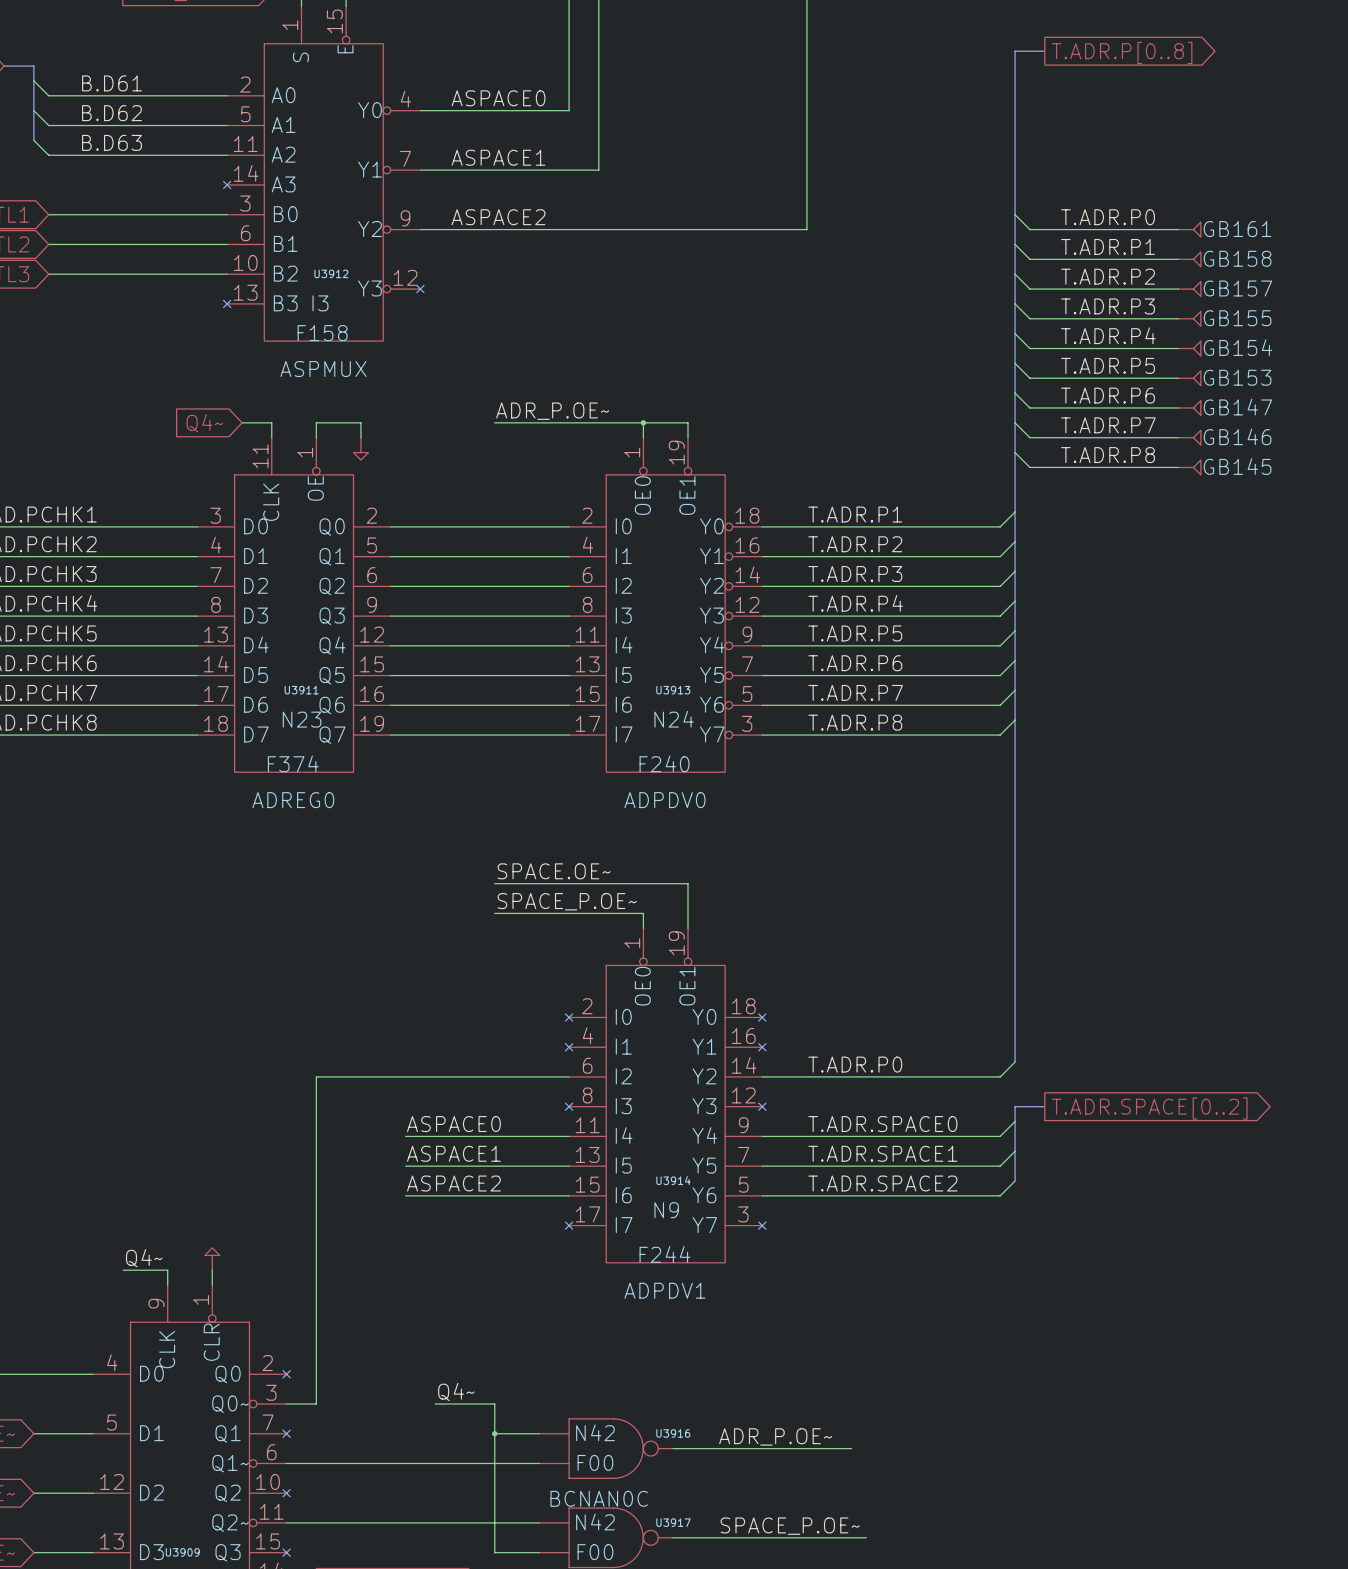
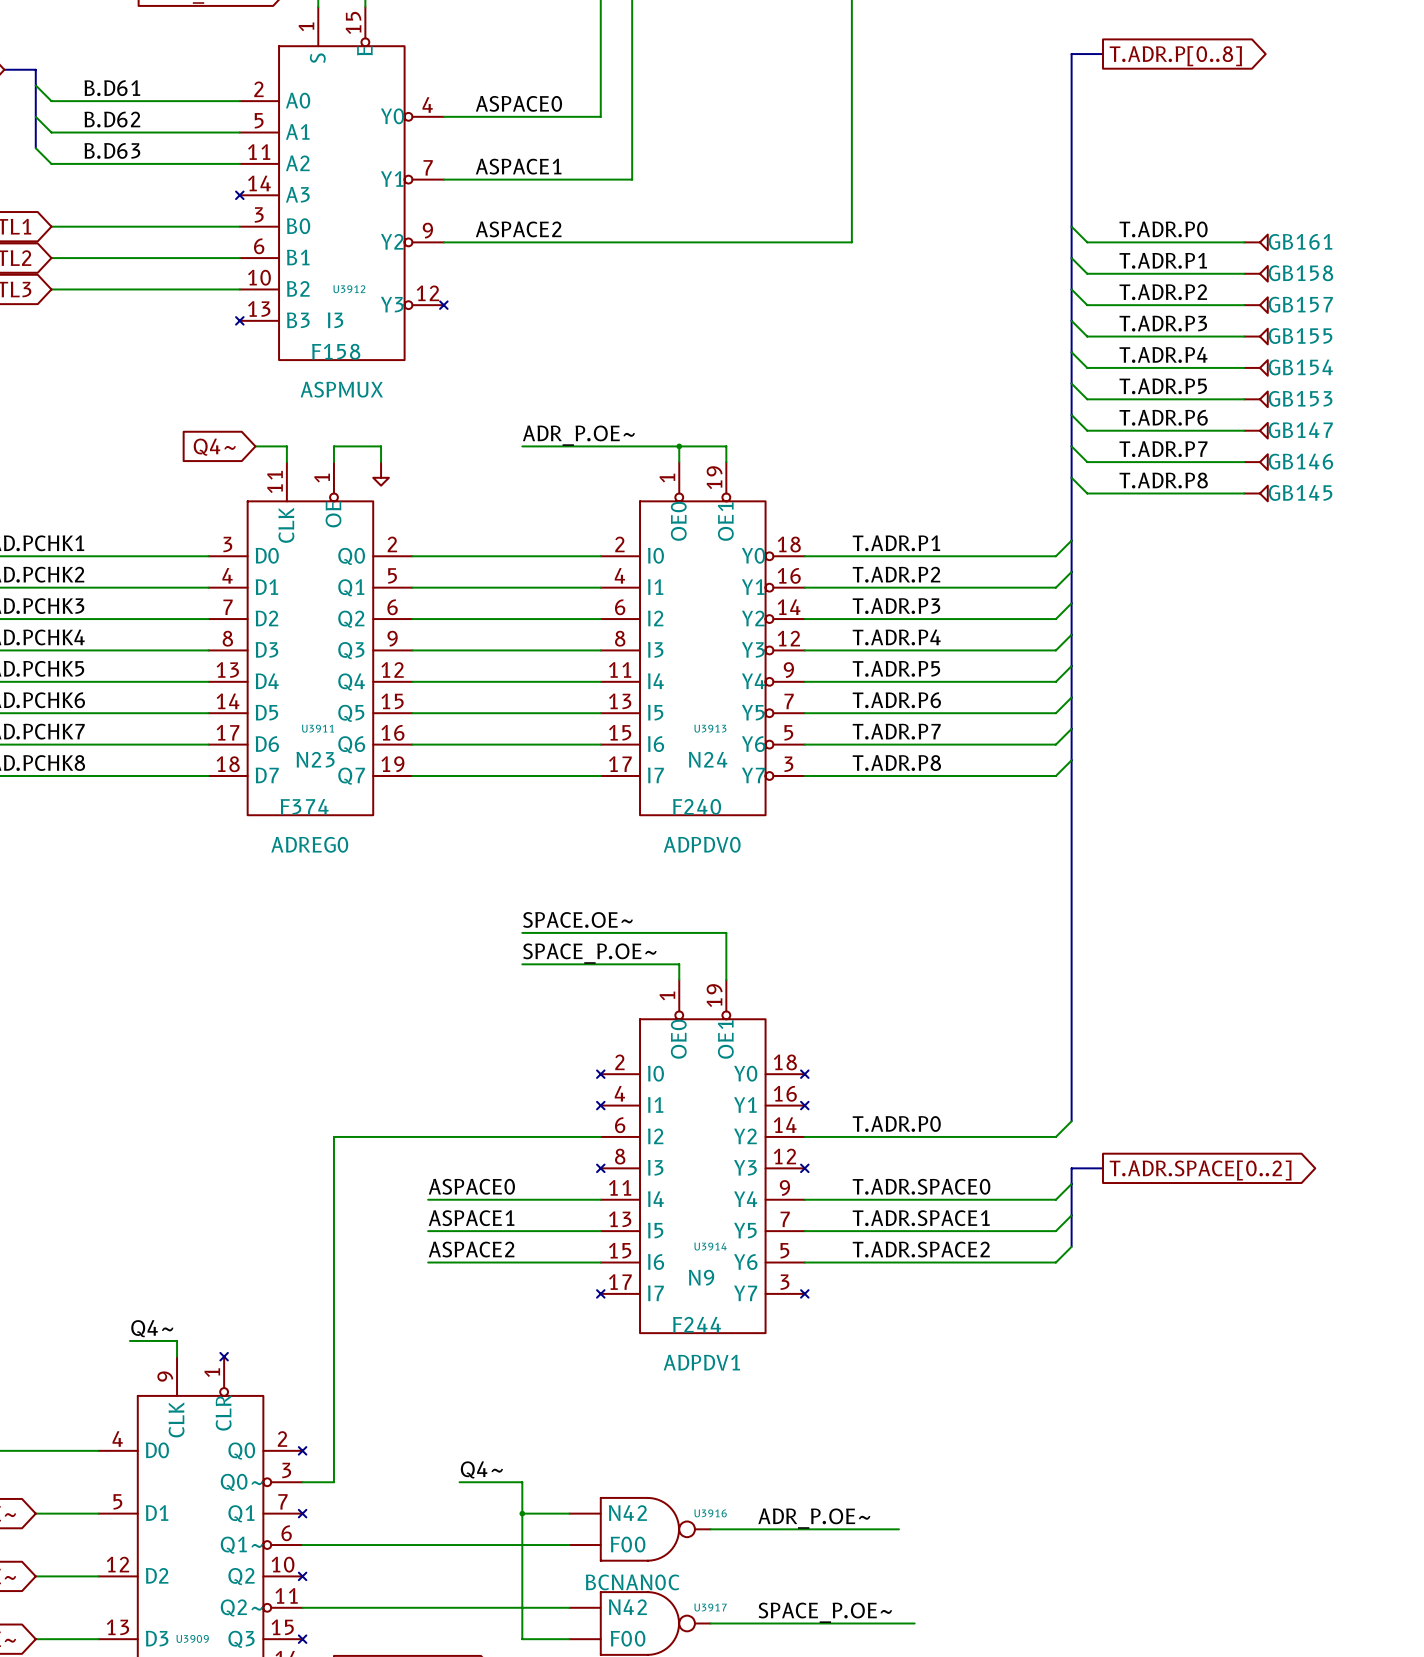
power symbol: (212, 1258) -> none
wire: (212, 1270) (212, 1285) -> none
no-connect mark: none -> (224, 1356)

